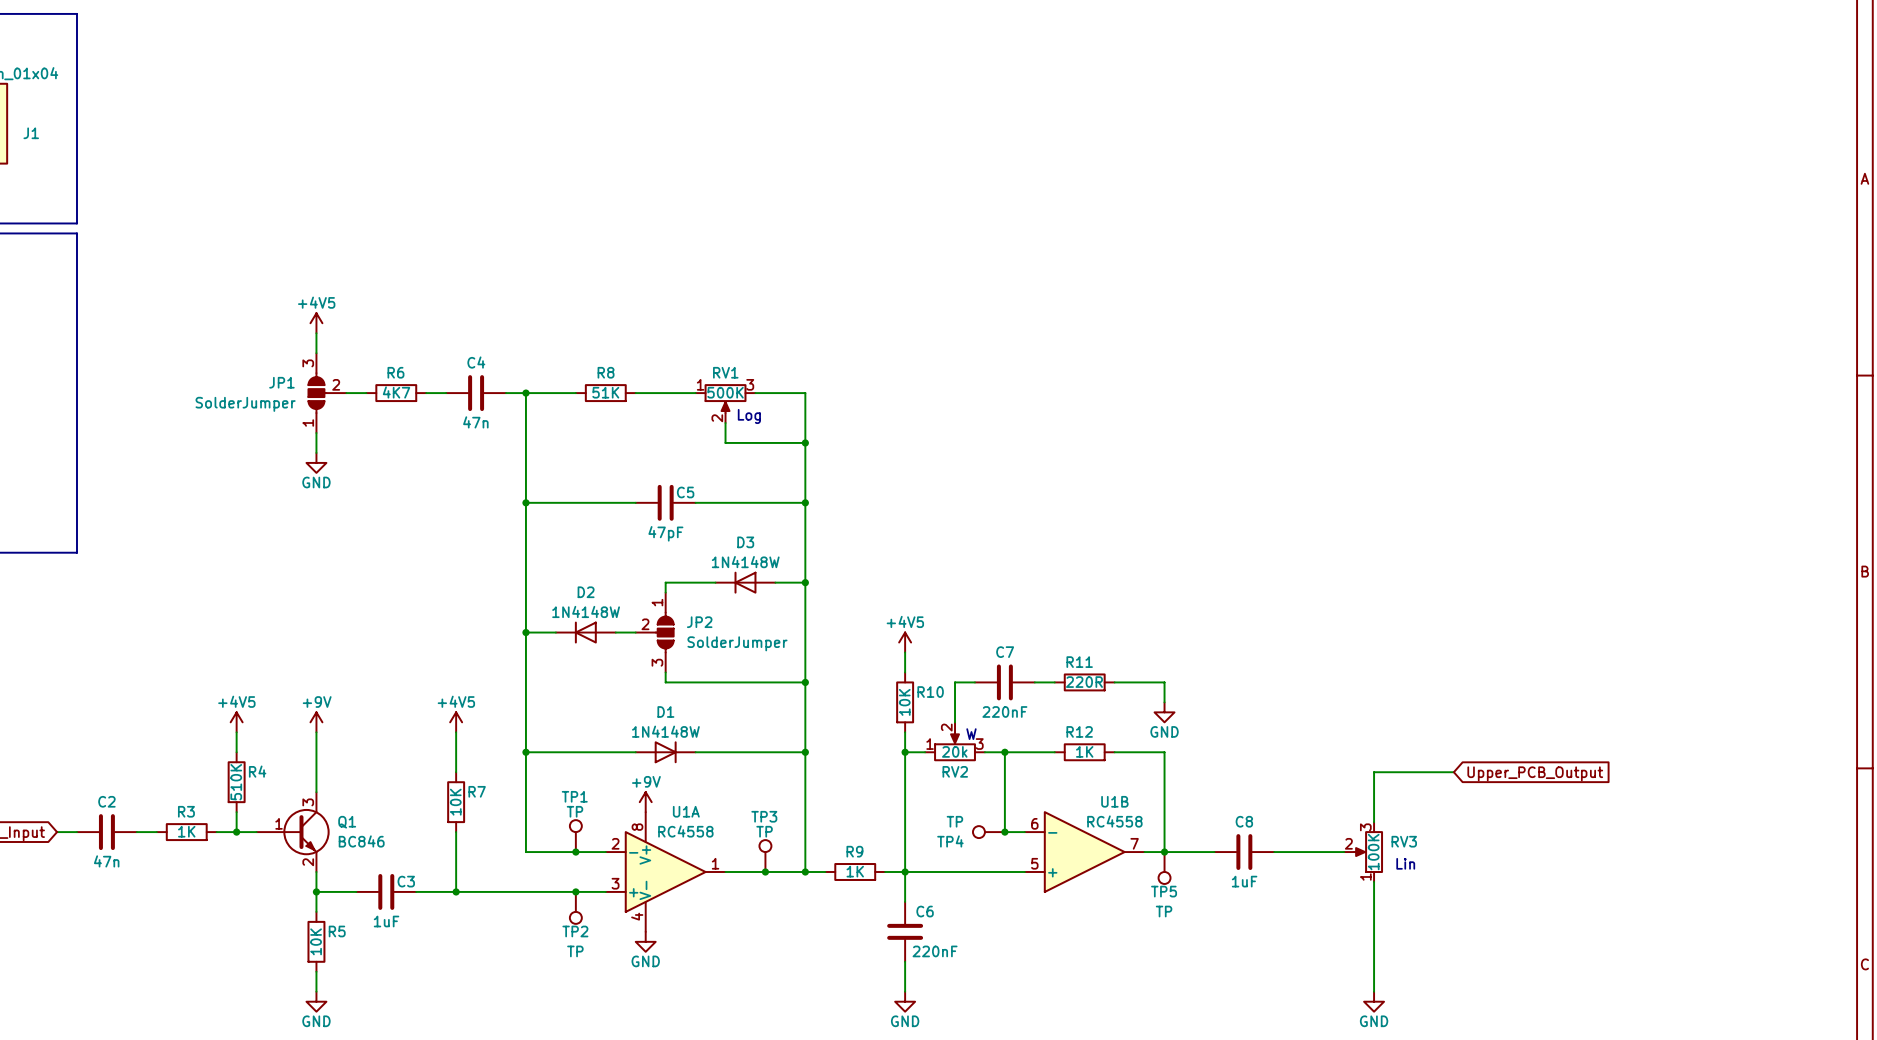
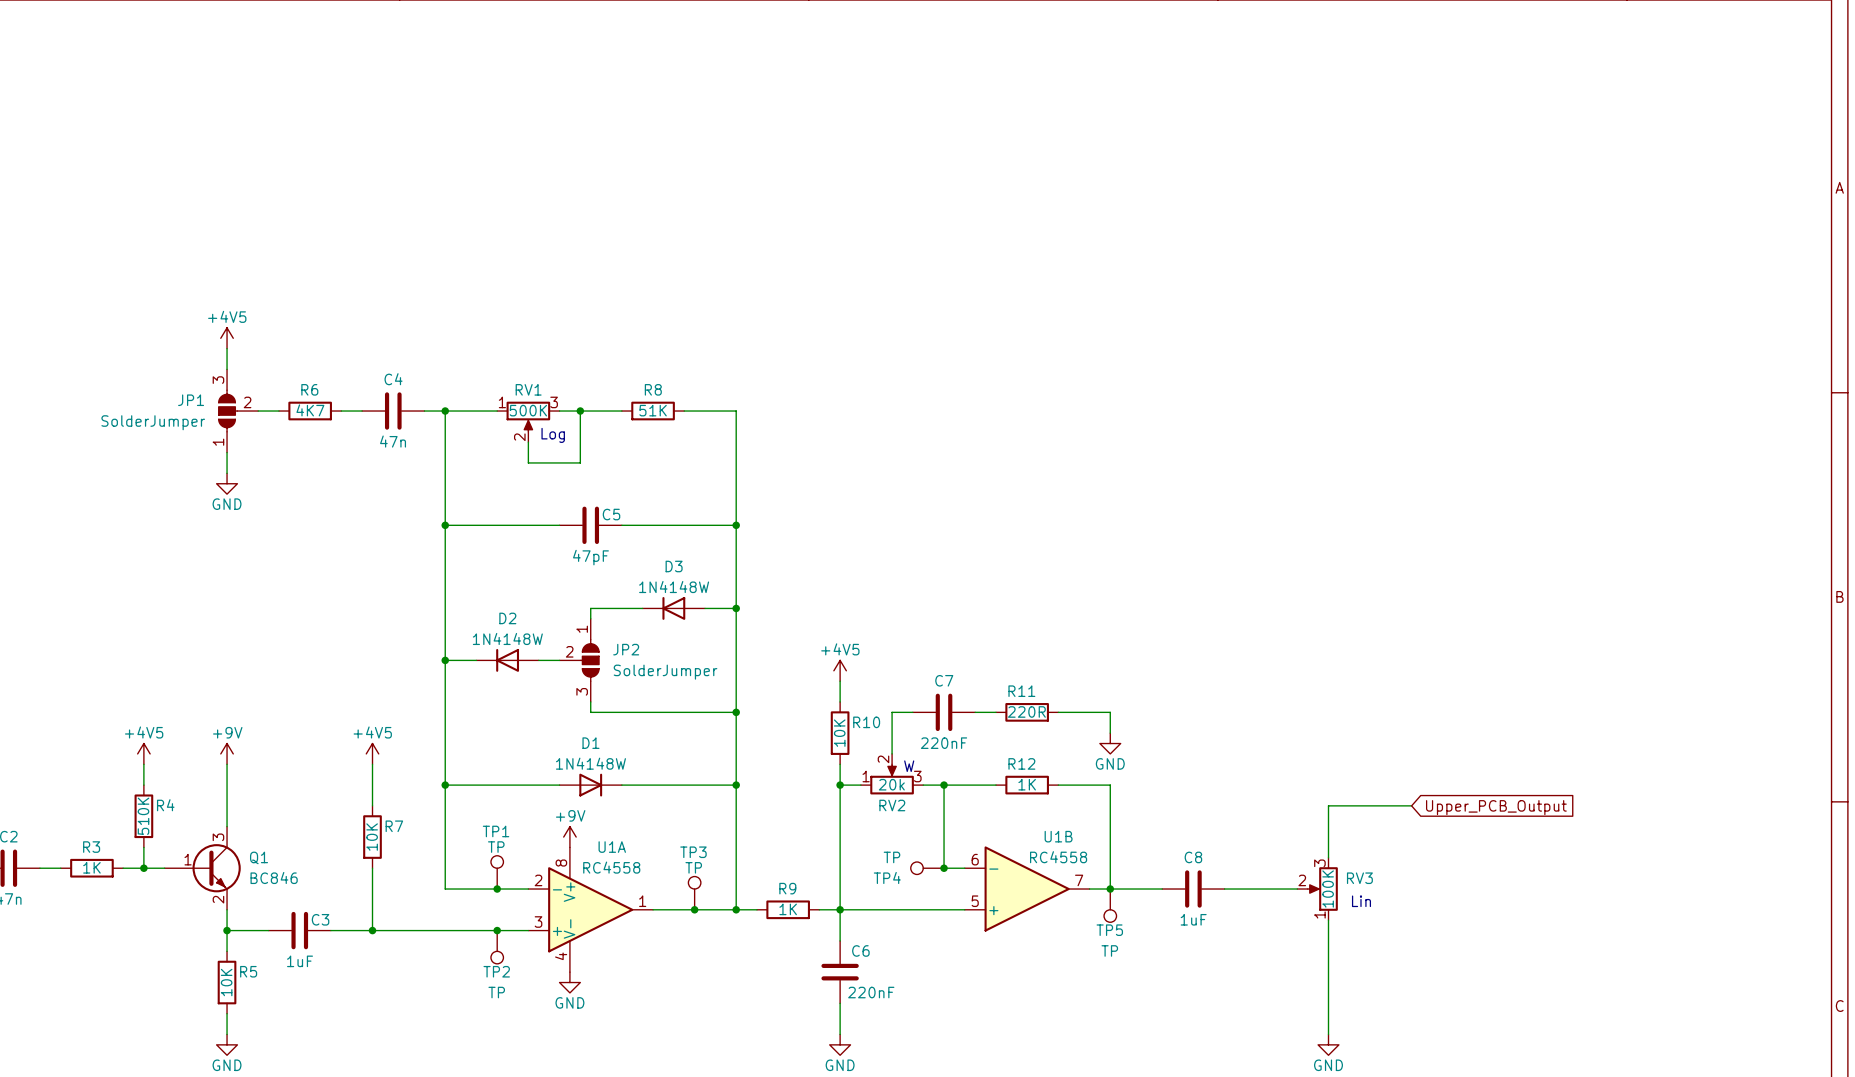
R8 position: (605, 393) -> (653, 411)
wire: none -> (580, 411) (580, 462) (528, 462) (528, 442)
junction: none -> (580, 411)
RV1 position: (725, 403) -> (528, 421)
text position: Log (749, 416) -> Log (553, 435)
wire: (725, 423) (725, 442) (805, 442) -> none
junction: (805, 442) -> none

